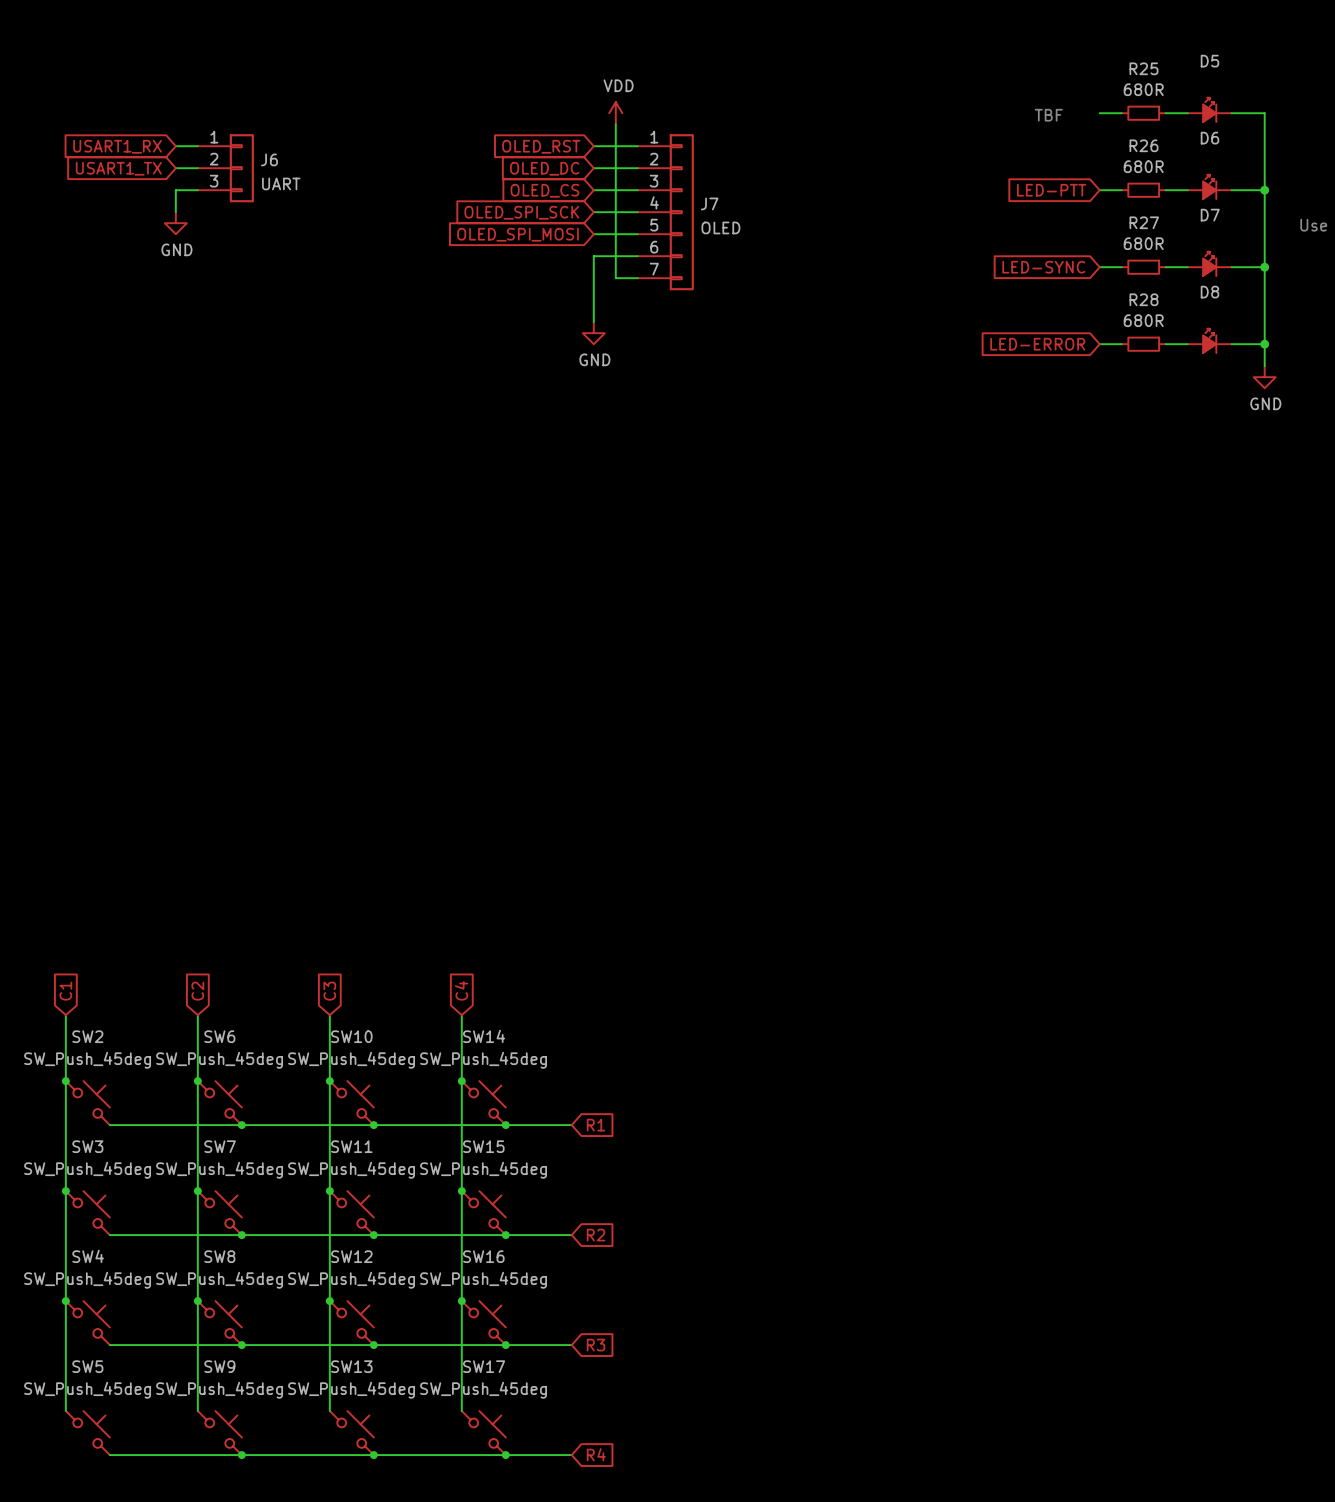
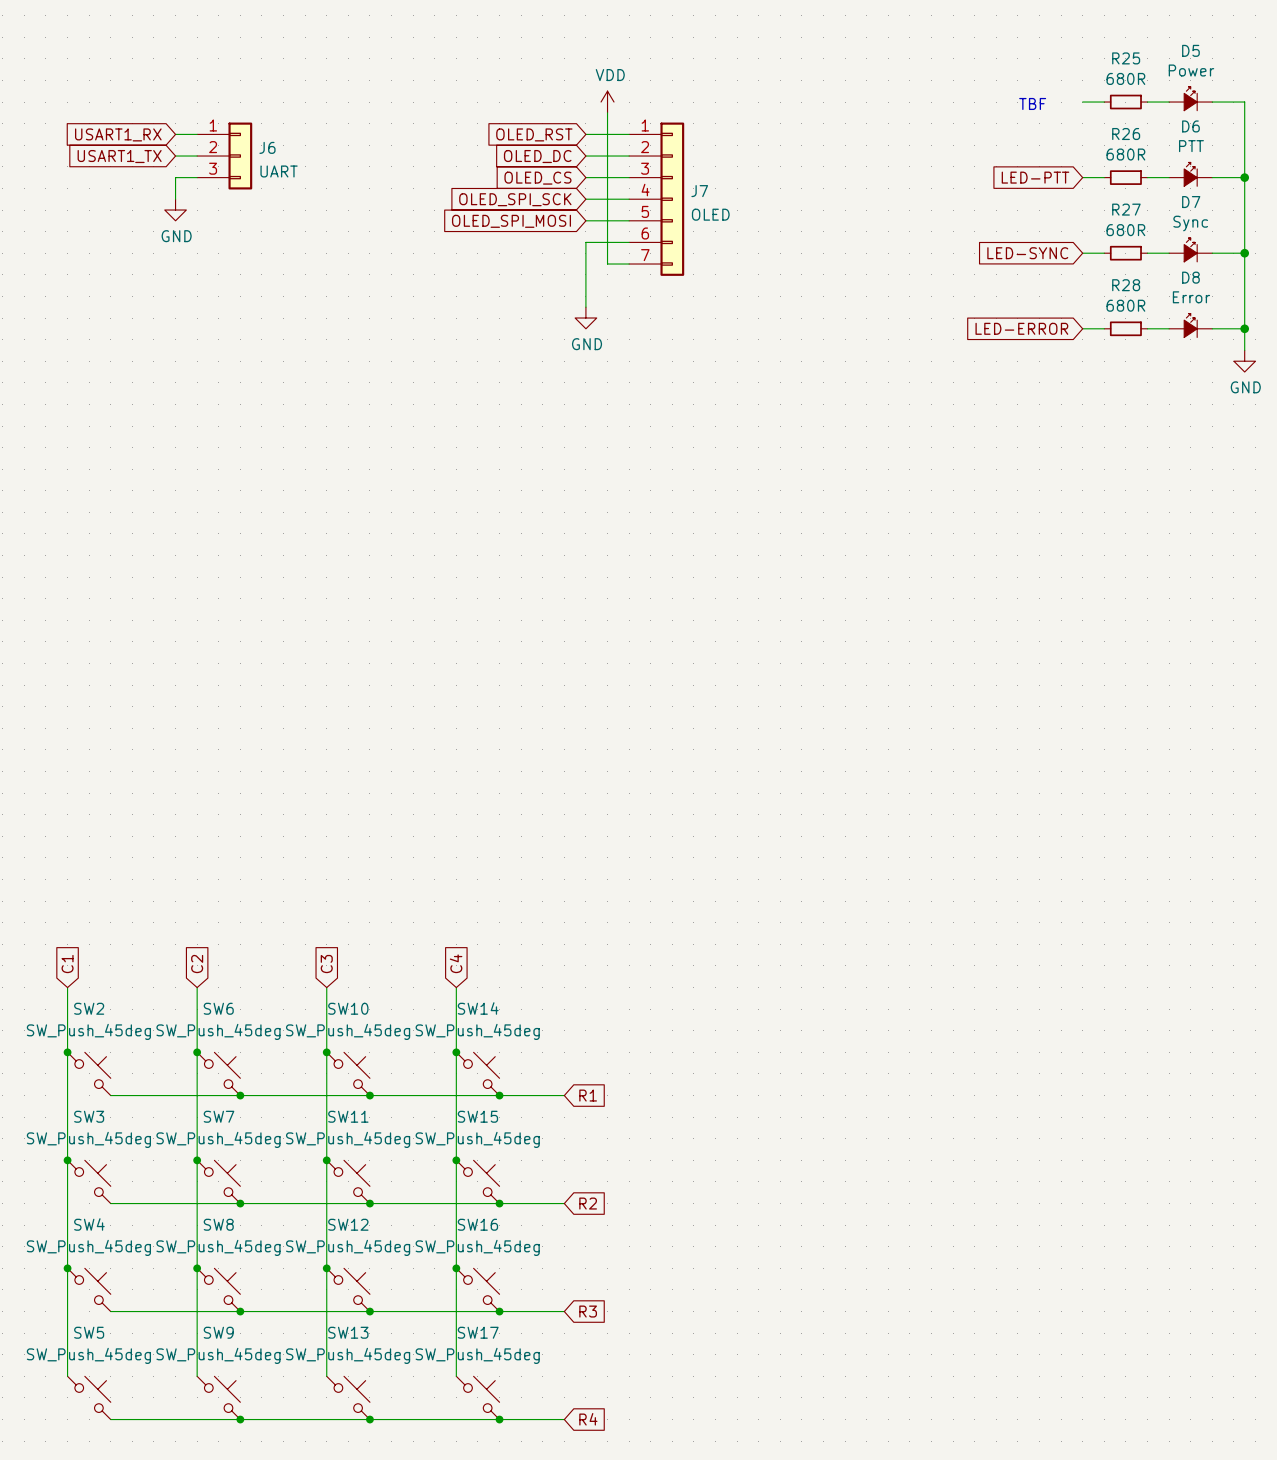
D5 value: none -> Power (1191, 70)
D6 value: none -> PTT (1191, 146)
D7 value: none -> Sync (1190, 223)
D8 value: none -> Error (1191, 297)

